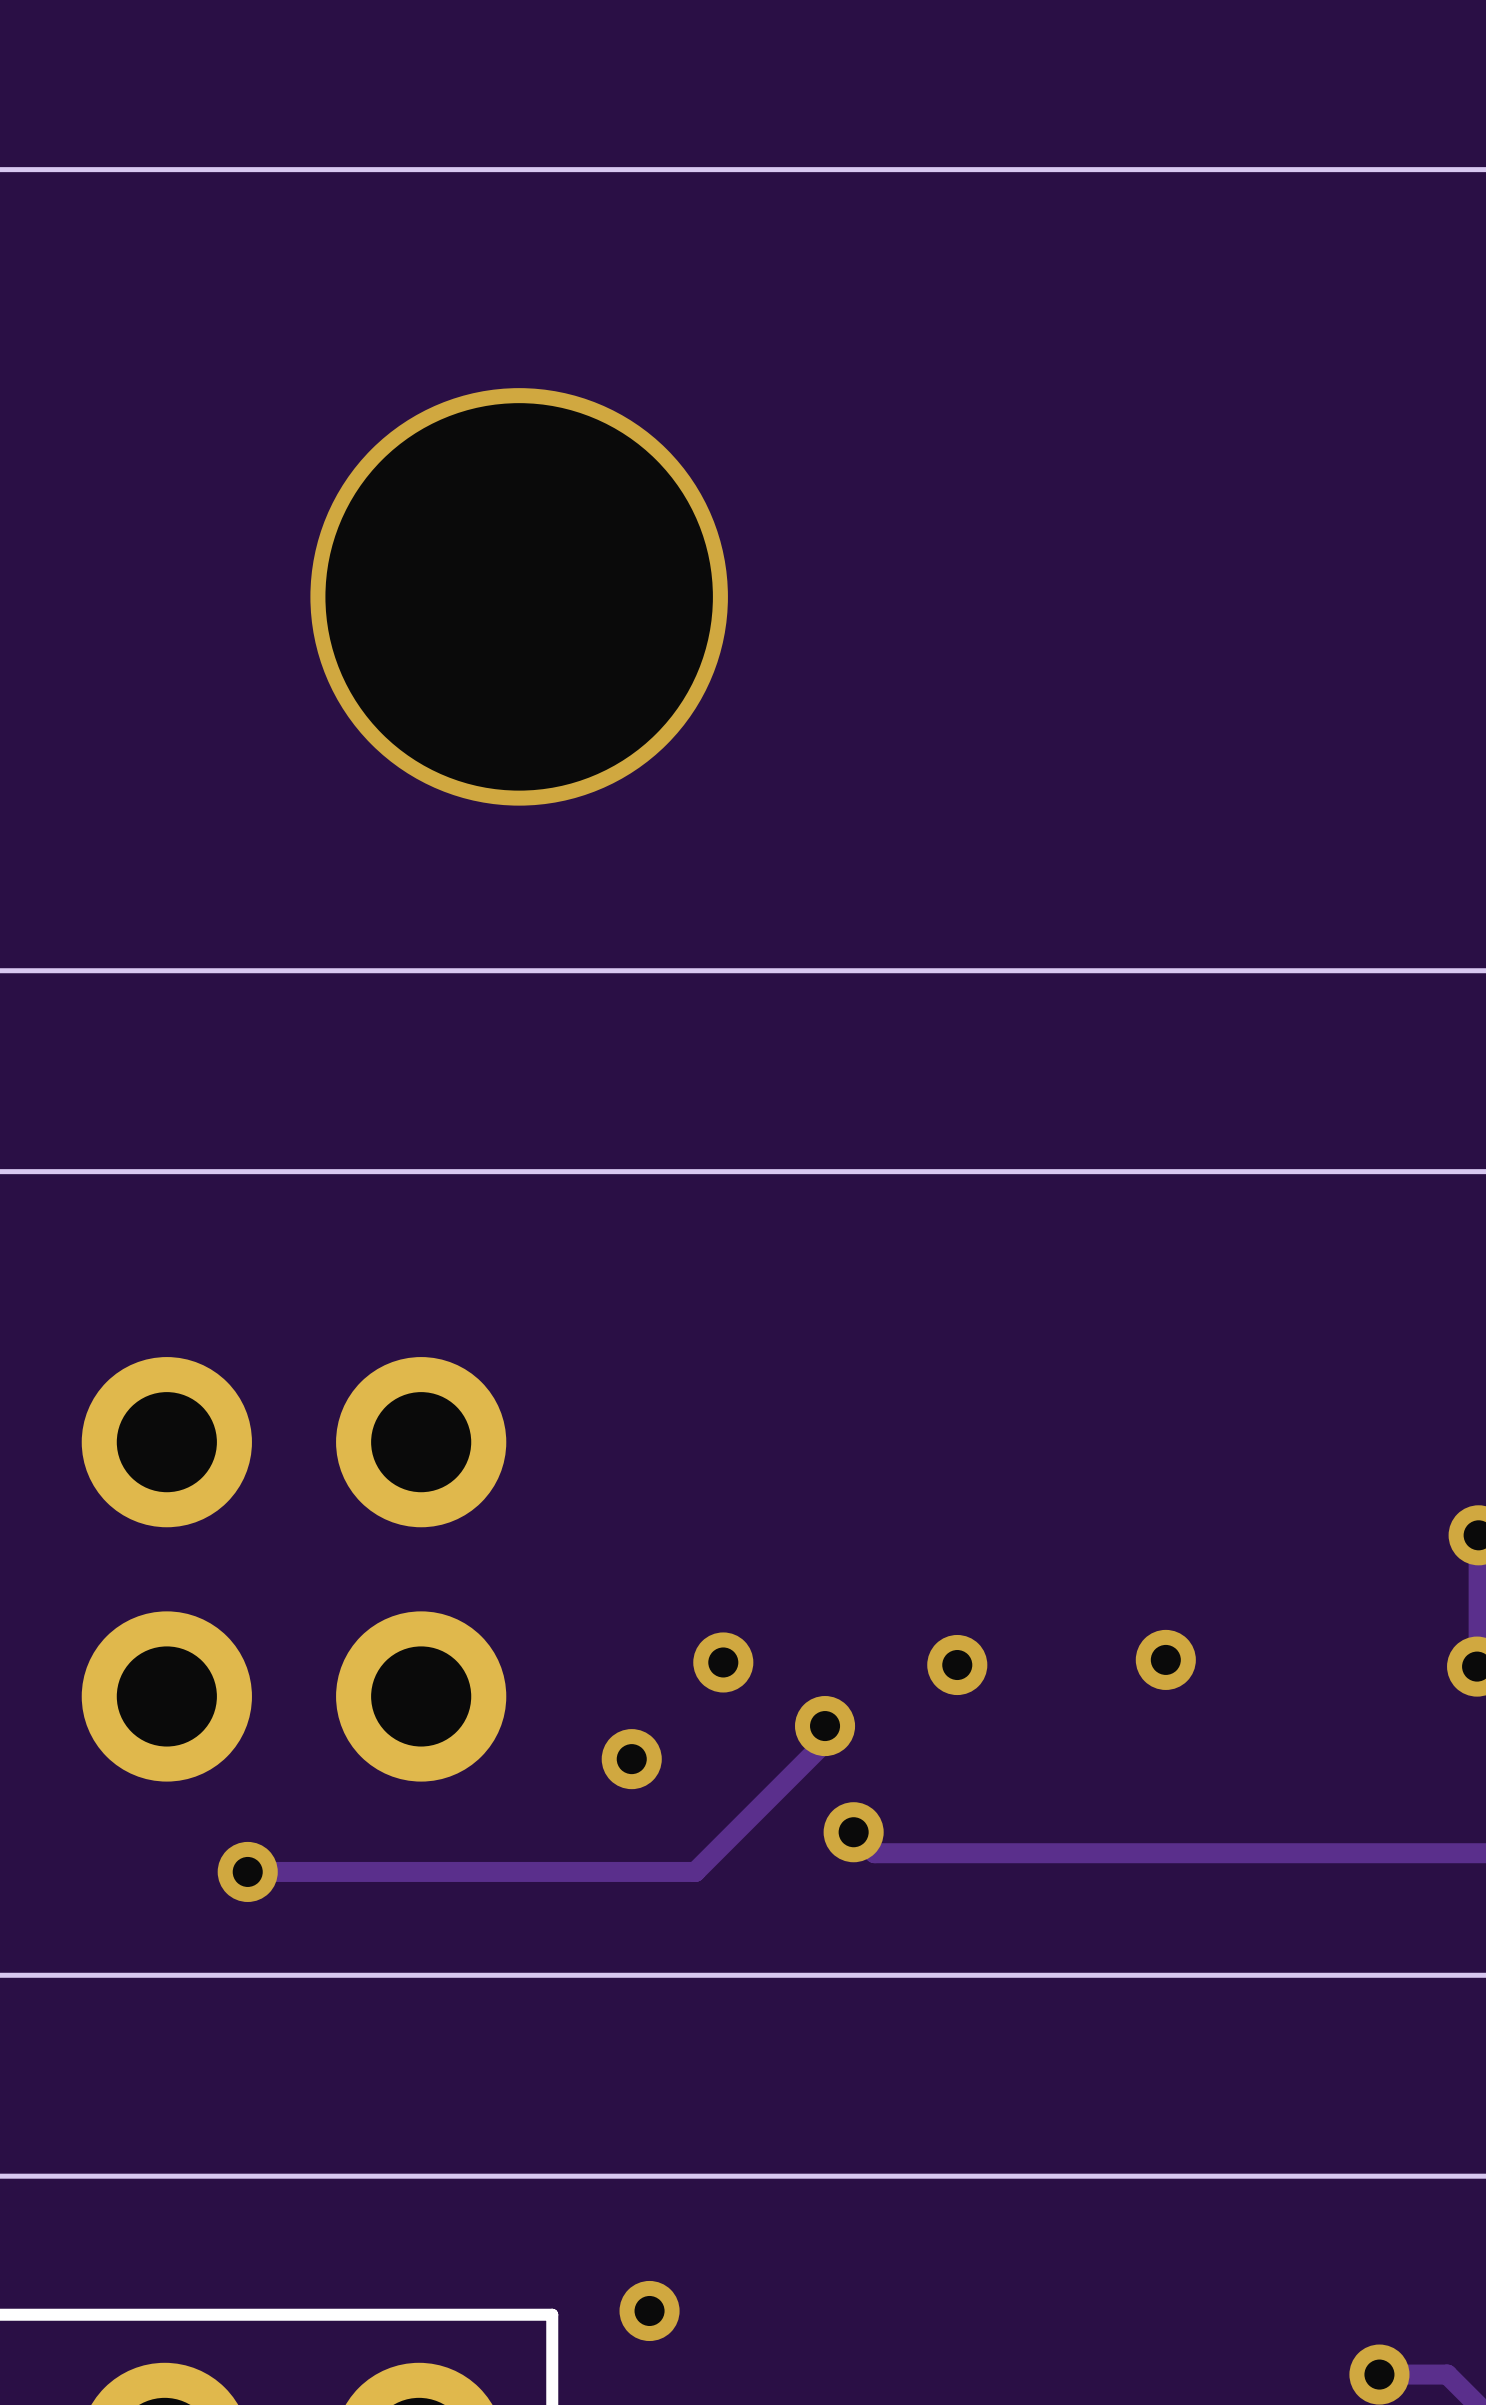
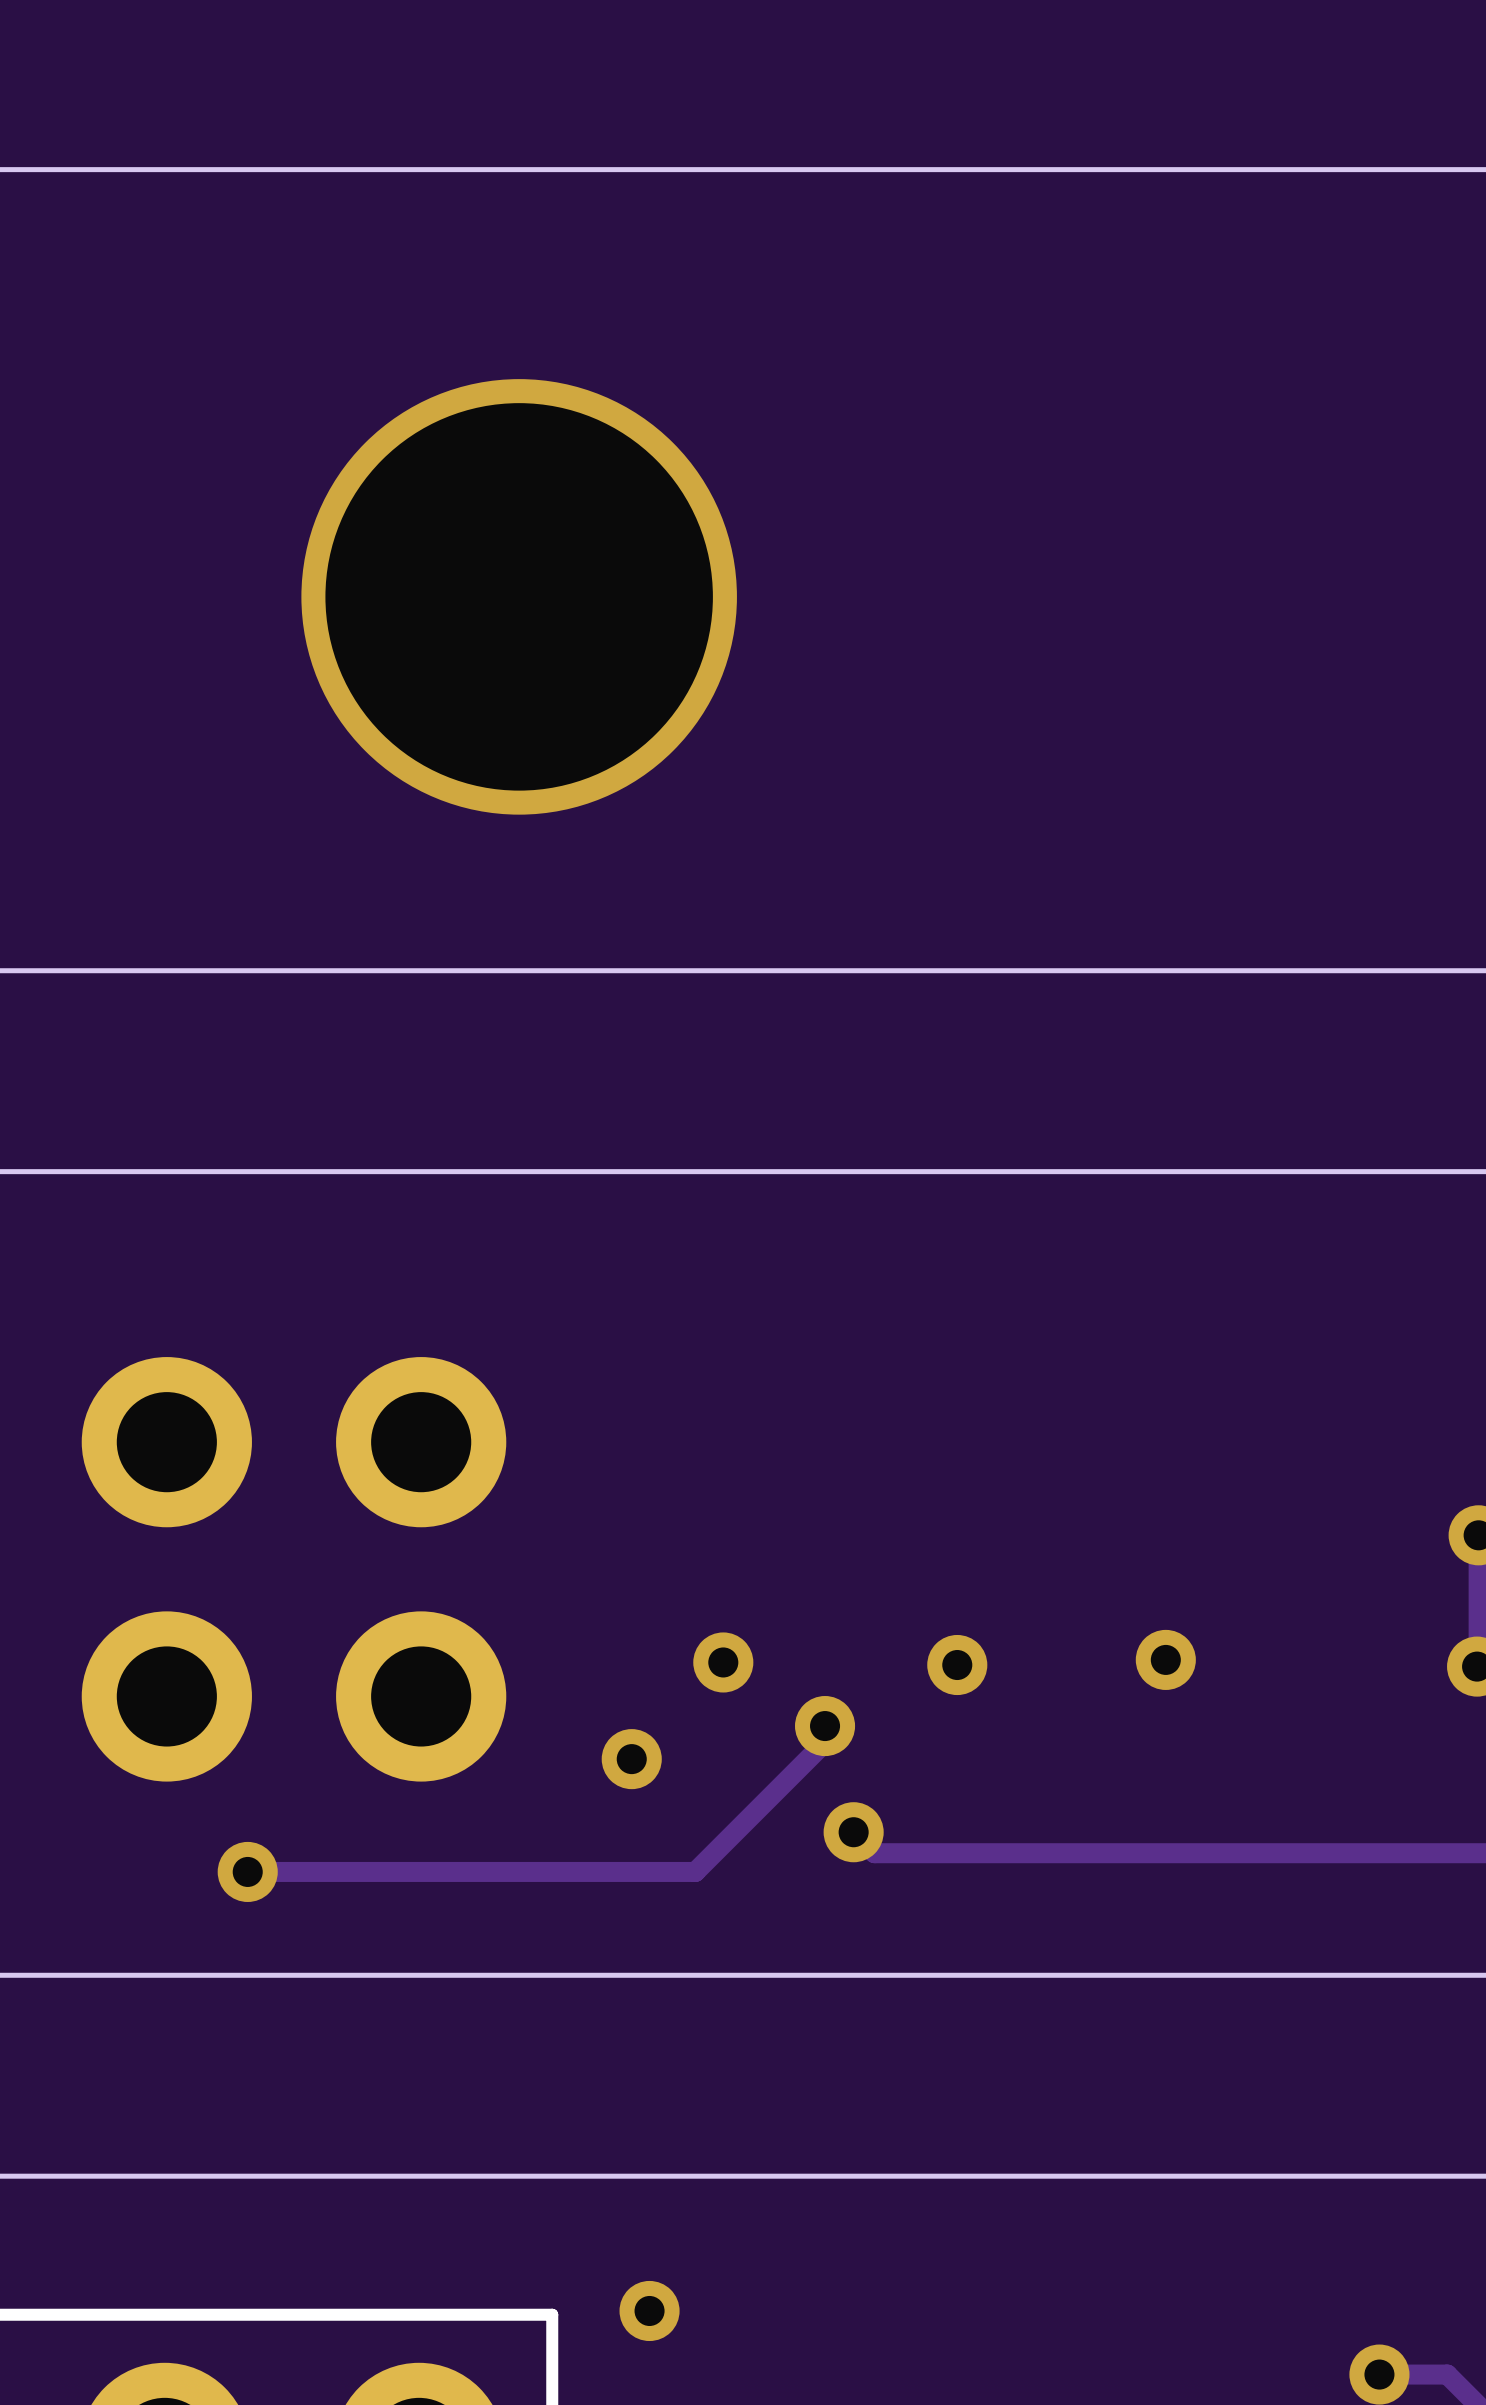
via size: [310, 388, 728, 806] -> [301, 379, 737, 815]

